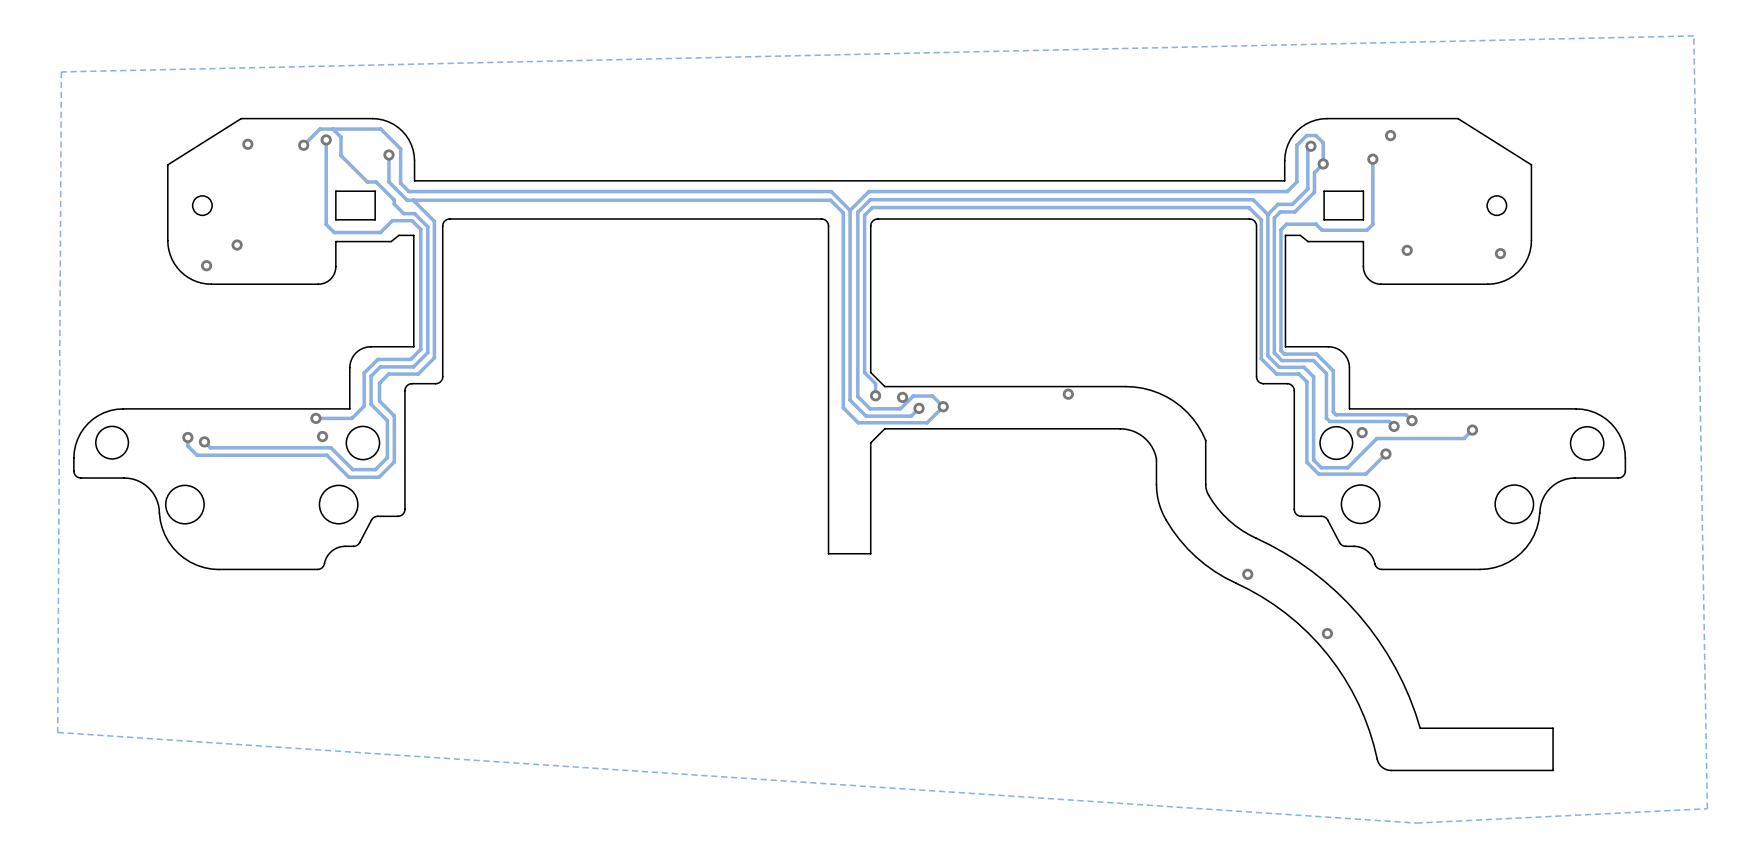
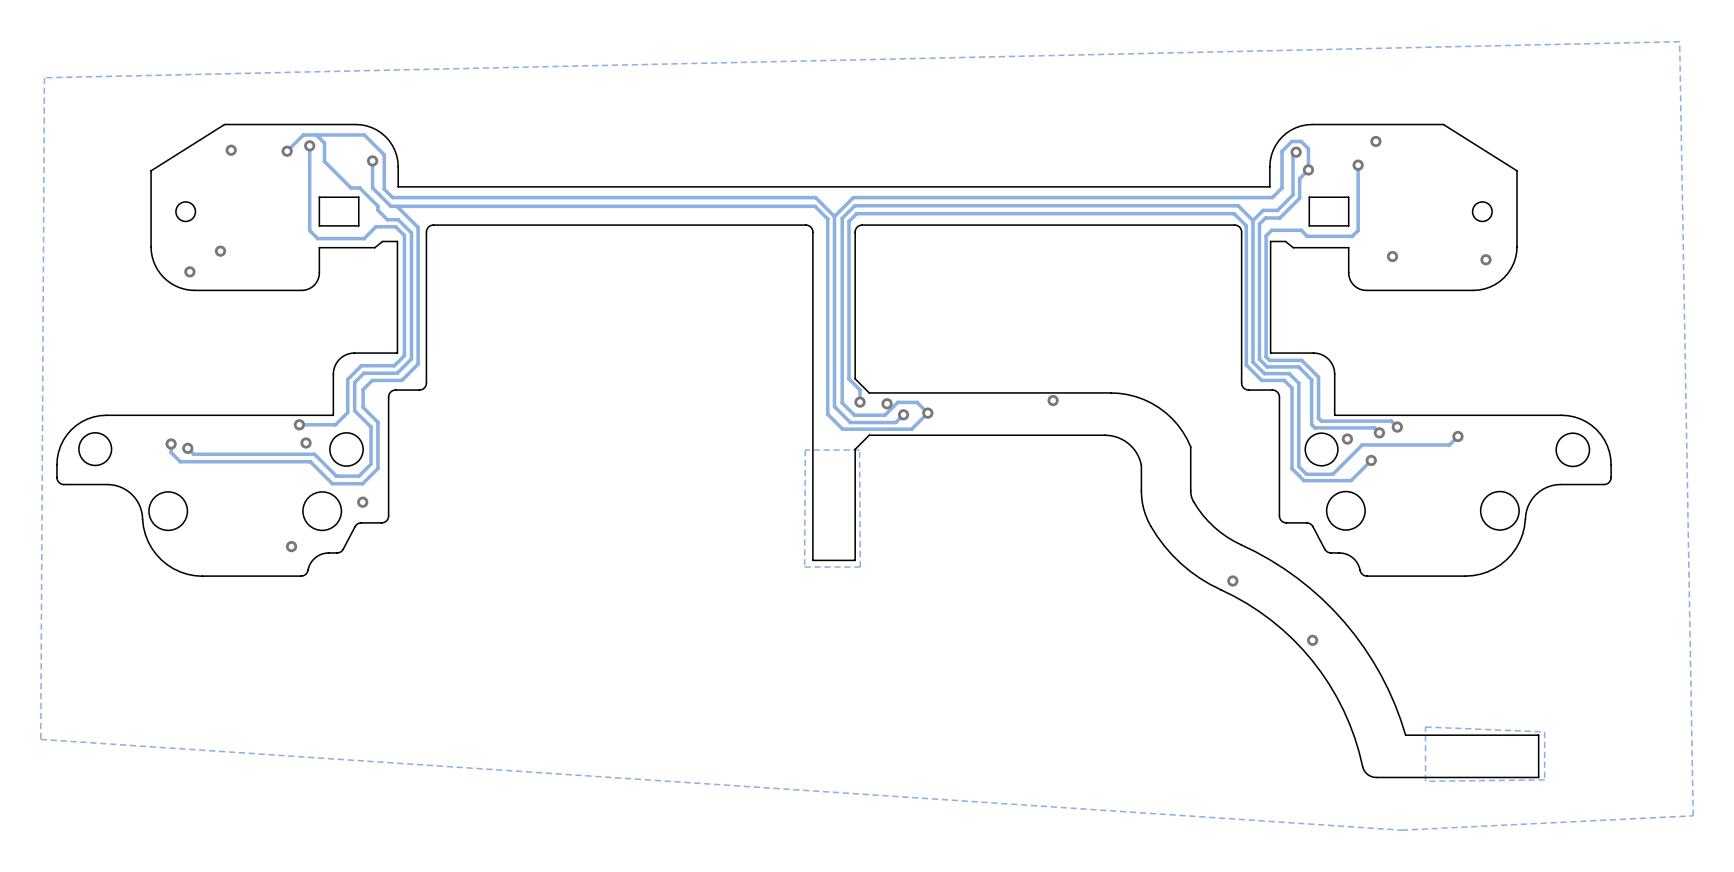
zone outline: none -> (859, 450) (805, 450) (804, 567) (860, 567) (859, 450)
via: none -> (362, 502)
via: none -> (291, 546)
zone outline: none -> (1425, 727) (1425, 781) (1544, 779) (1544, 731) (1425, 727)

